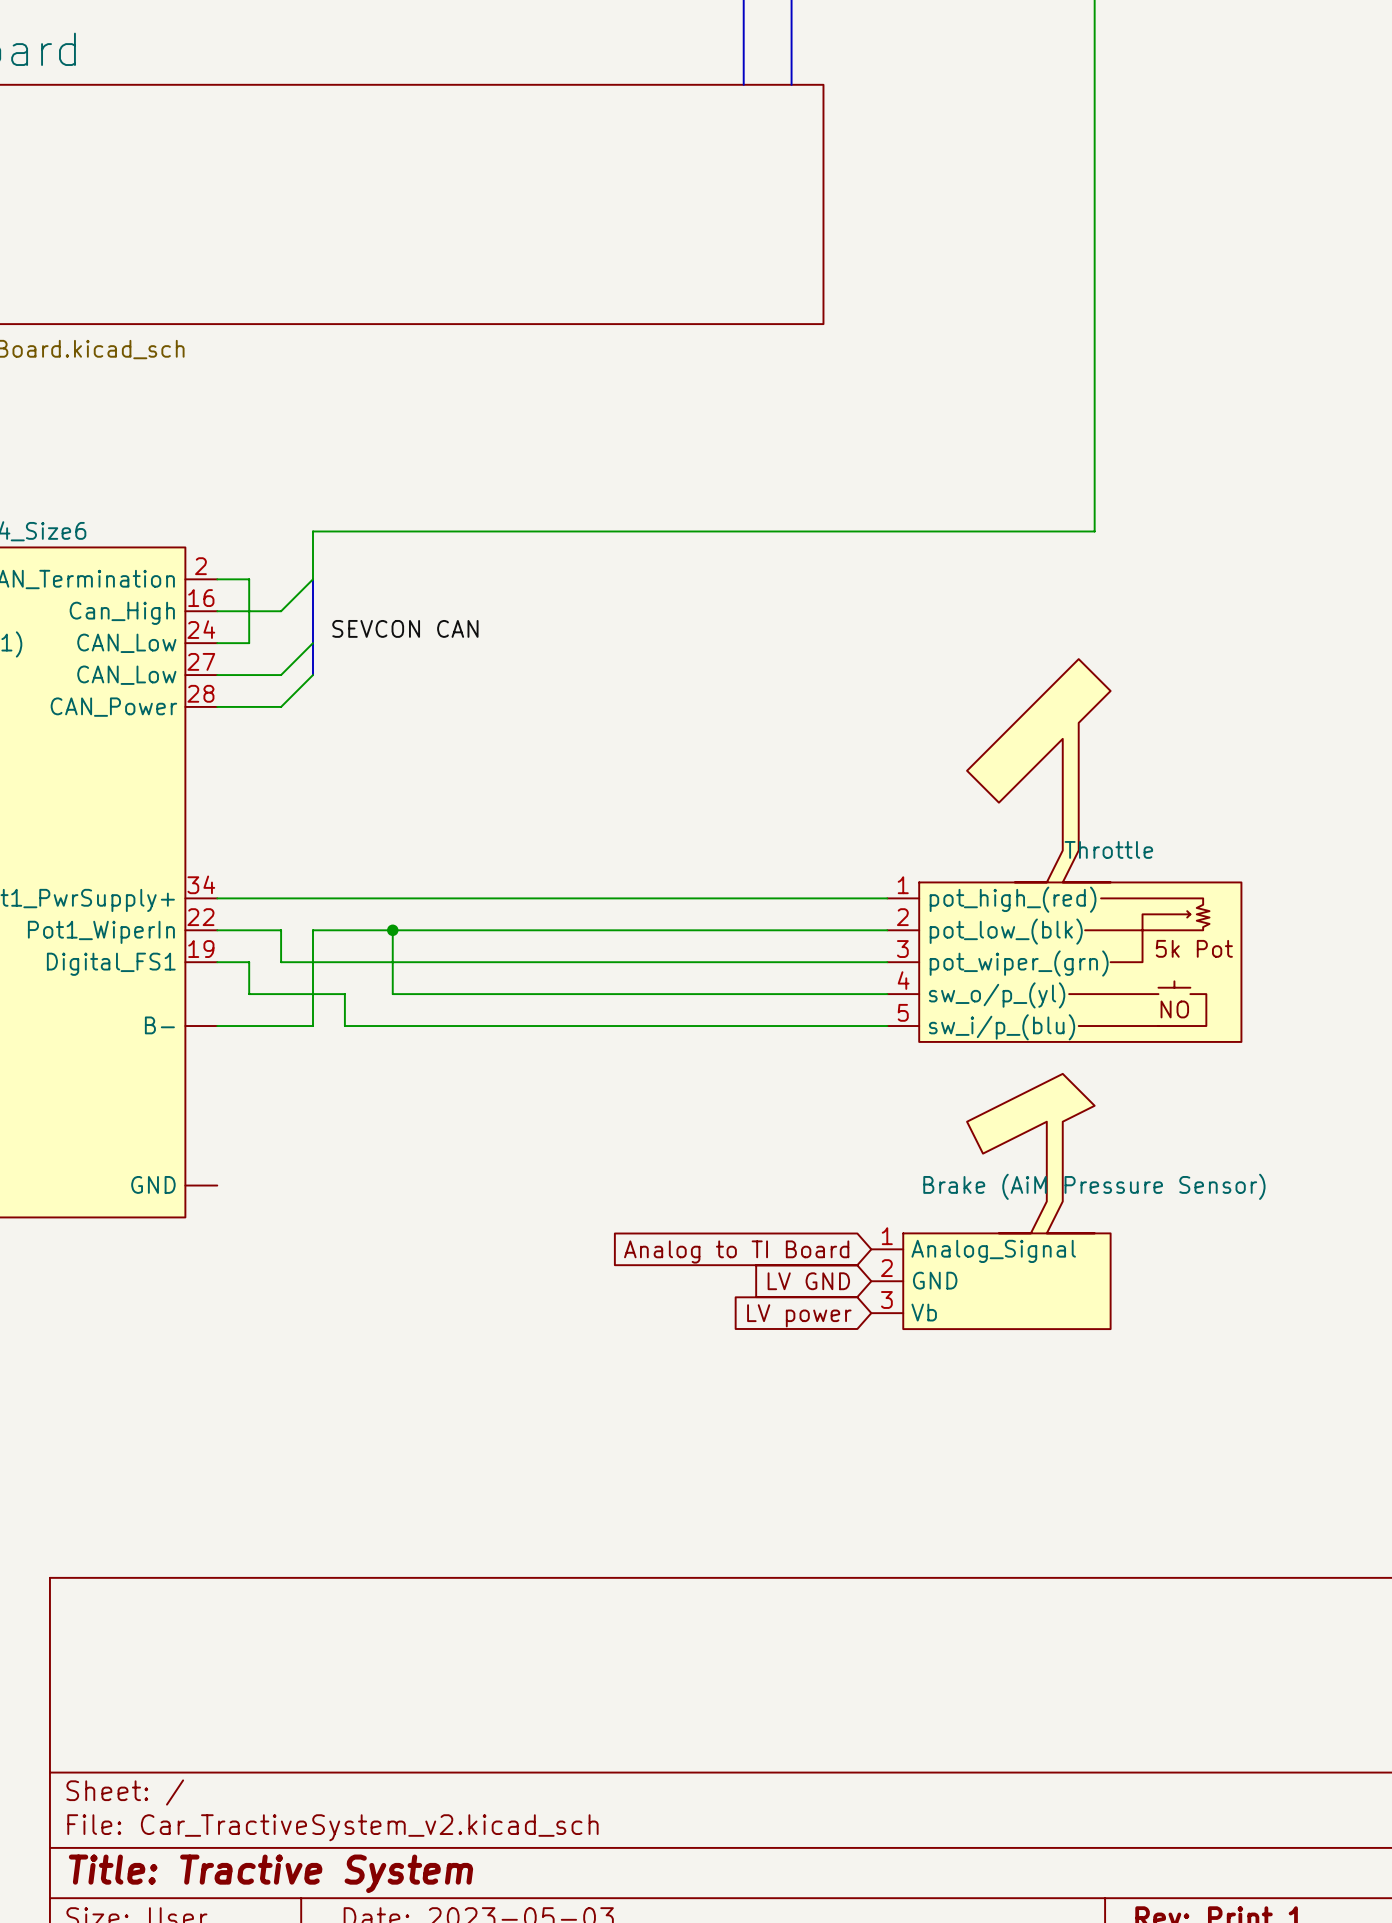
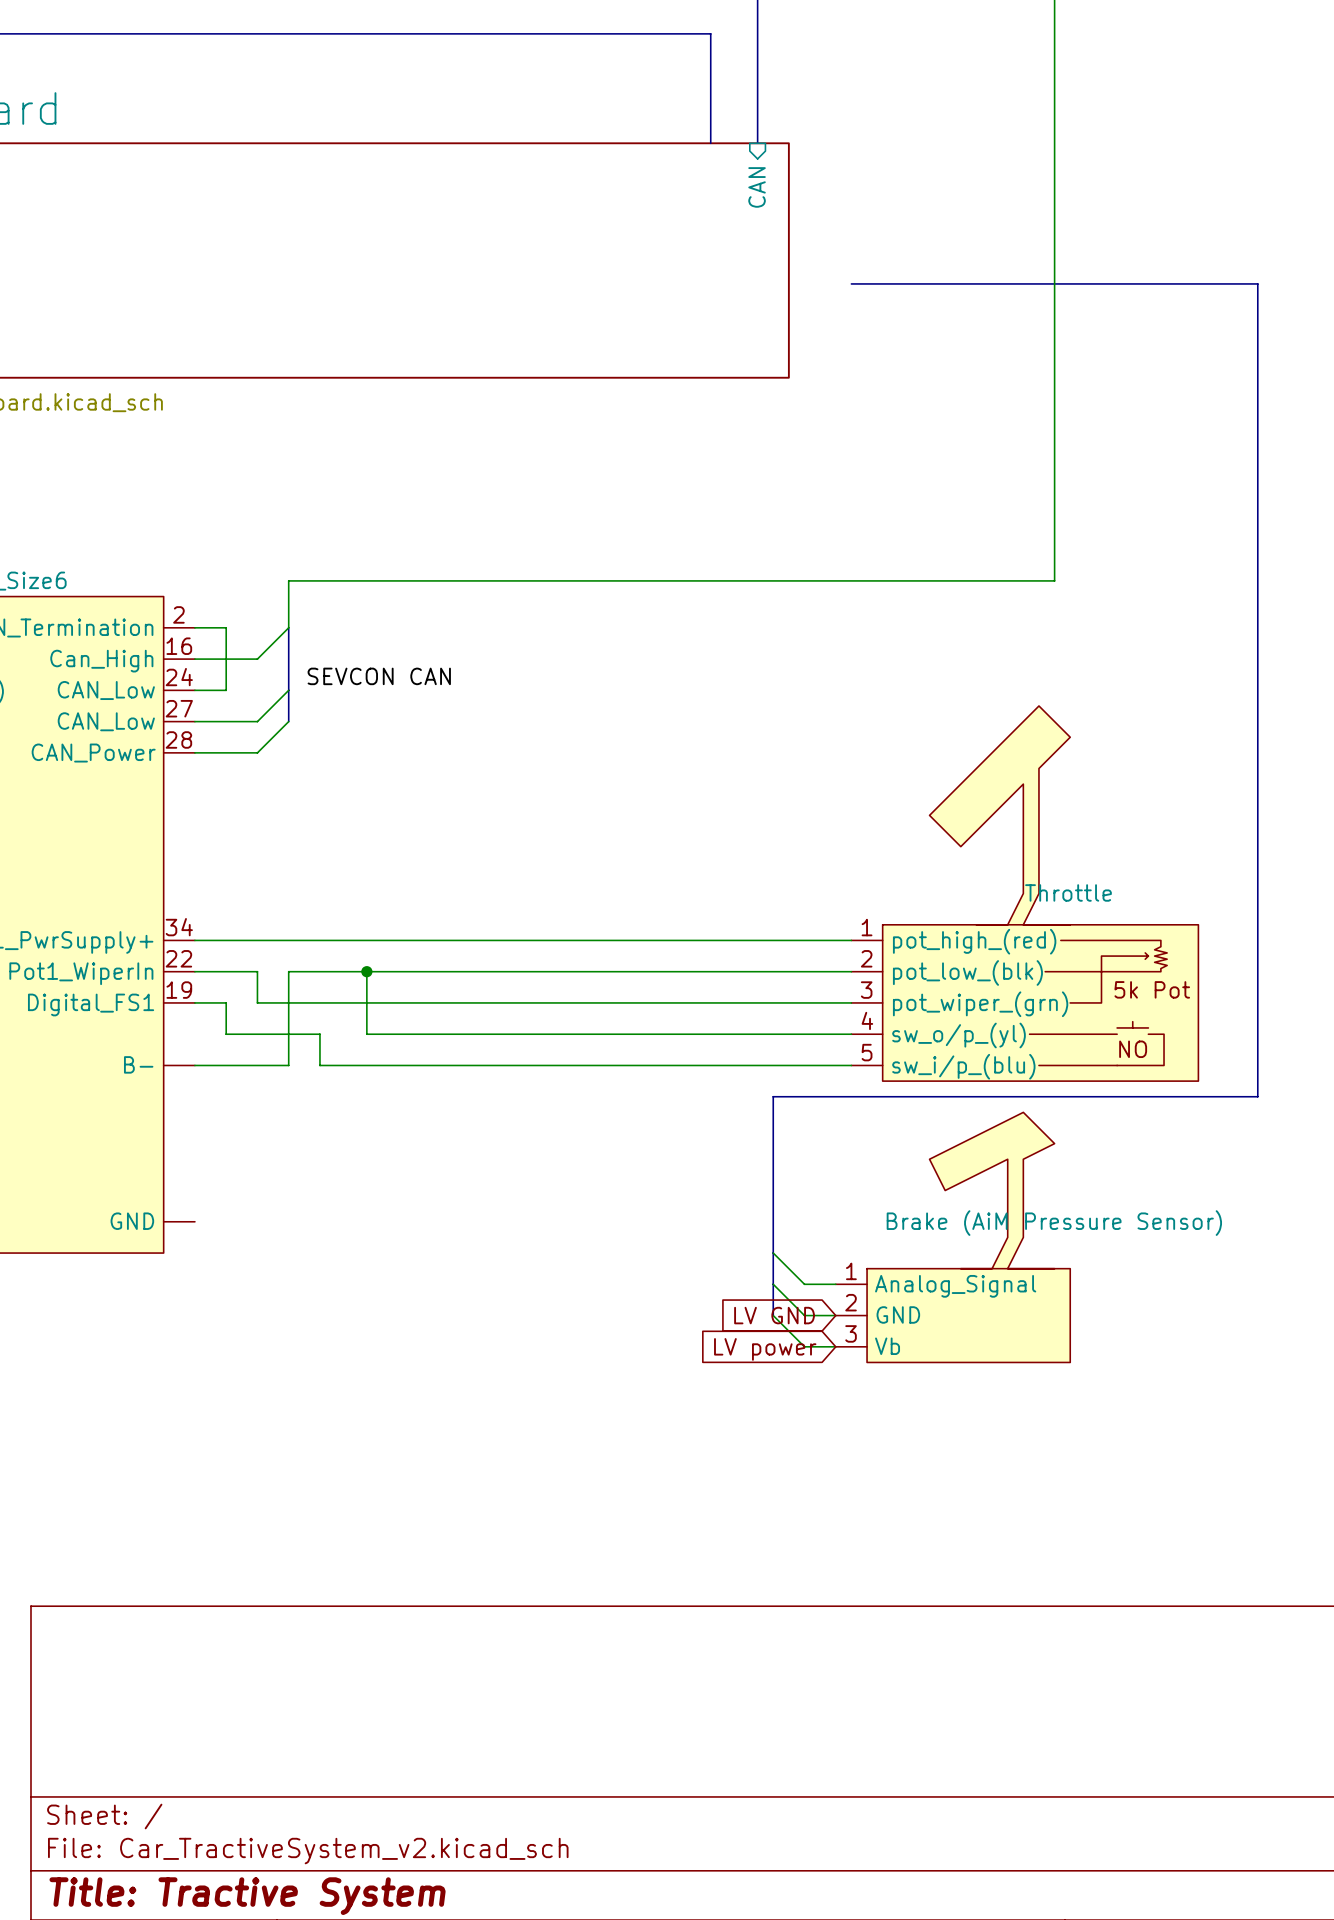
sheet pin: none -> CAN (757, 187)
bus: none -> (851, 283) (1257, 283) (1257, 1096) (773, 1096) (773, 1315)
wire: none -> (773, 1253) (804, 1284) (835, 1284)
wire: none -> (773, 1284) (804, 1315) (835, 1315)
global label: Analog to TI Board (736, 1252) -> none
wire: none -> (773, 1315) (804, 1346) (835, 1346)

